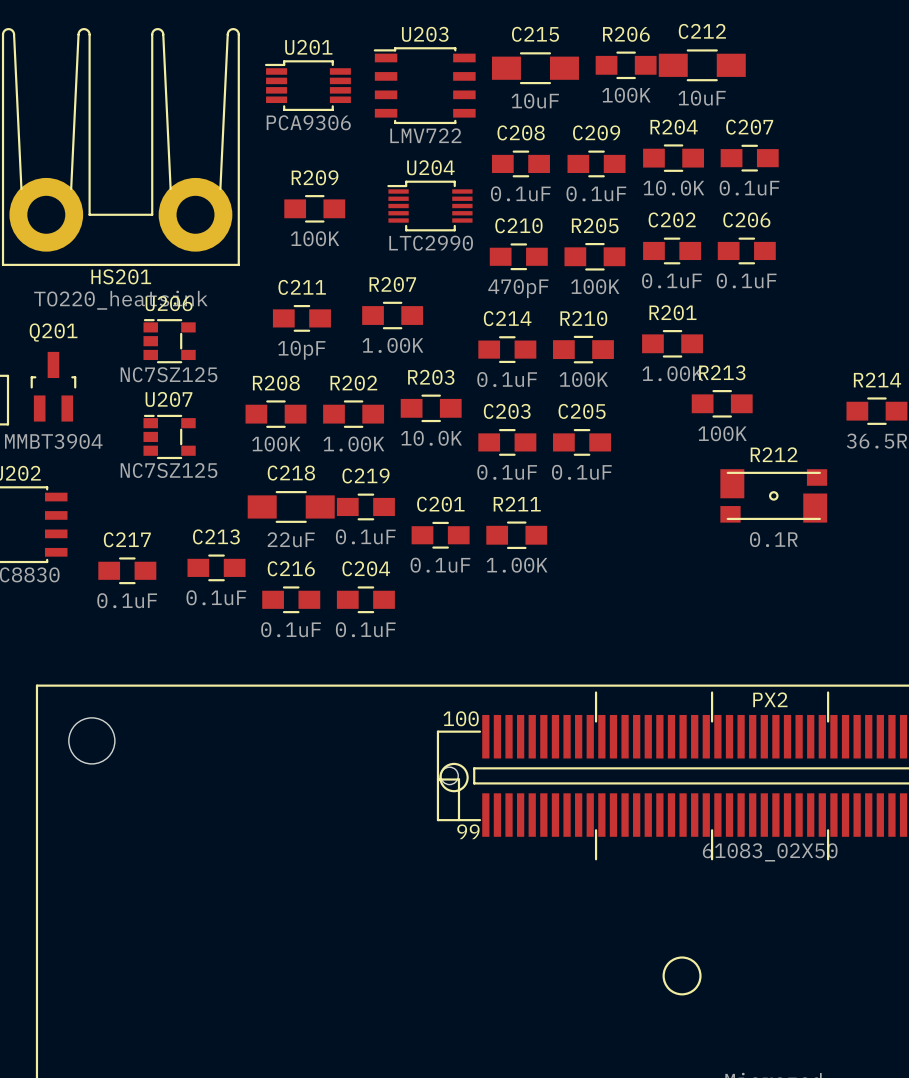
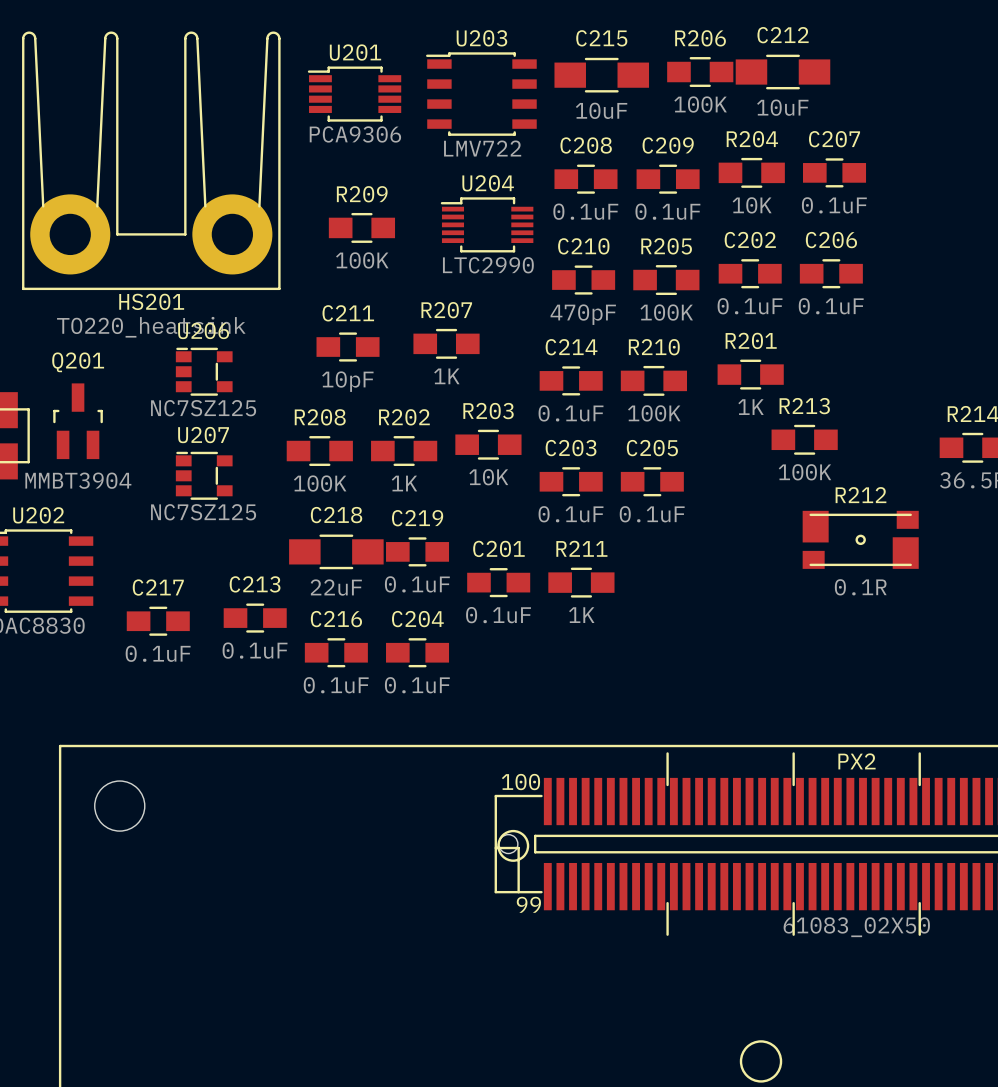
R204 value: 10.0K (673, 188) -> 10K (752, 205)
R207 value: 1.00K (392, 345) -> 1K (446, 376)
R201 value: 1.00K (672, 373) -> 1K (751, 407)
R203 value: 10.0K (431, 438) -> 10K (488, 477)
R202 value: 1.00K (353, 444) -> 1K (404, 483)
R211 value: 1.00K (517, 565) -> 1K (581, 615)

